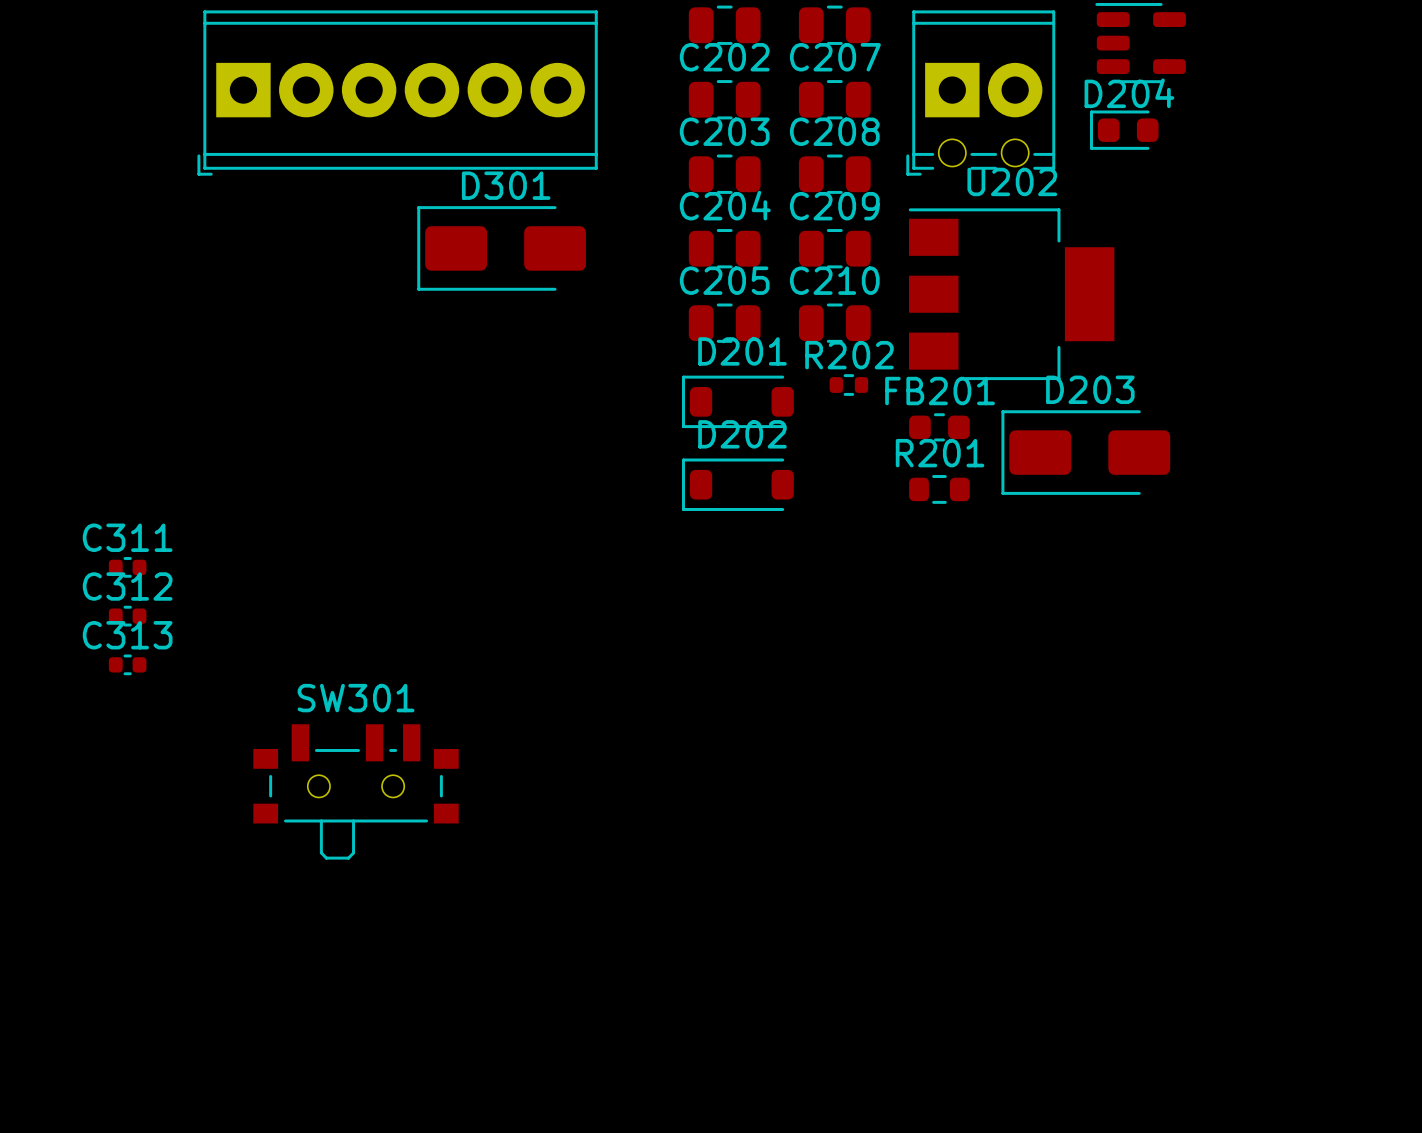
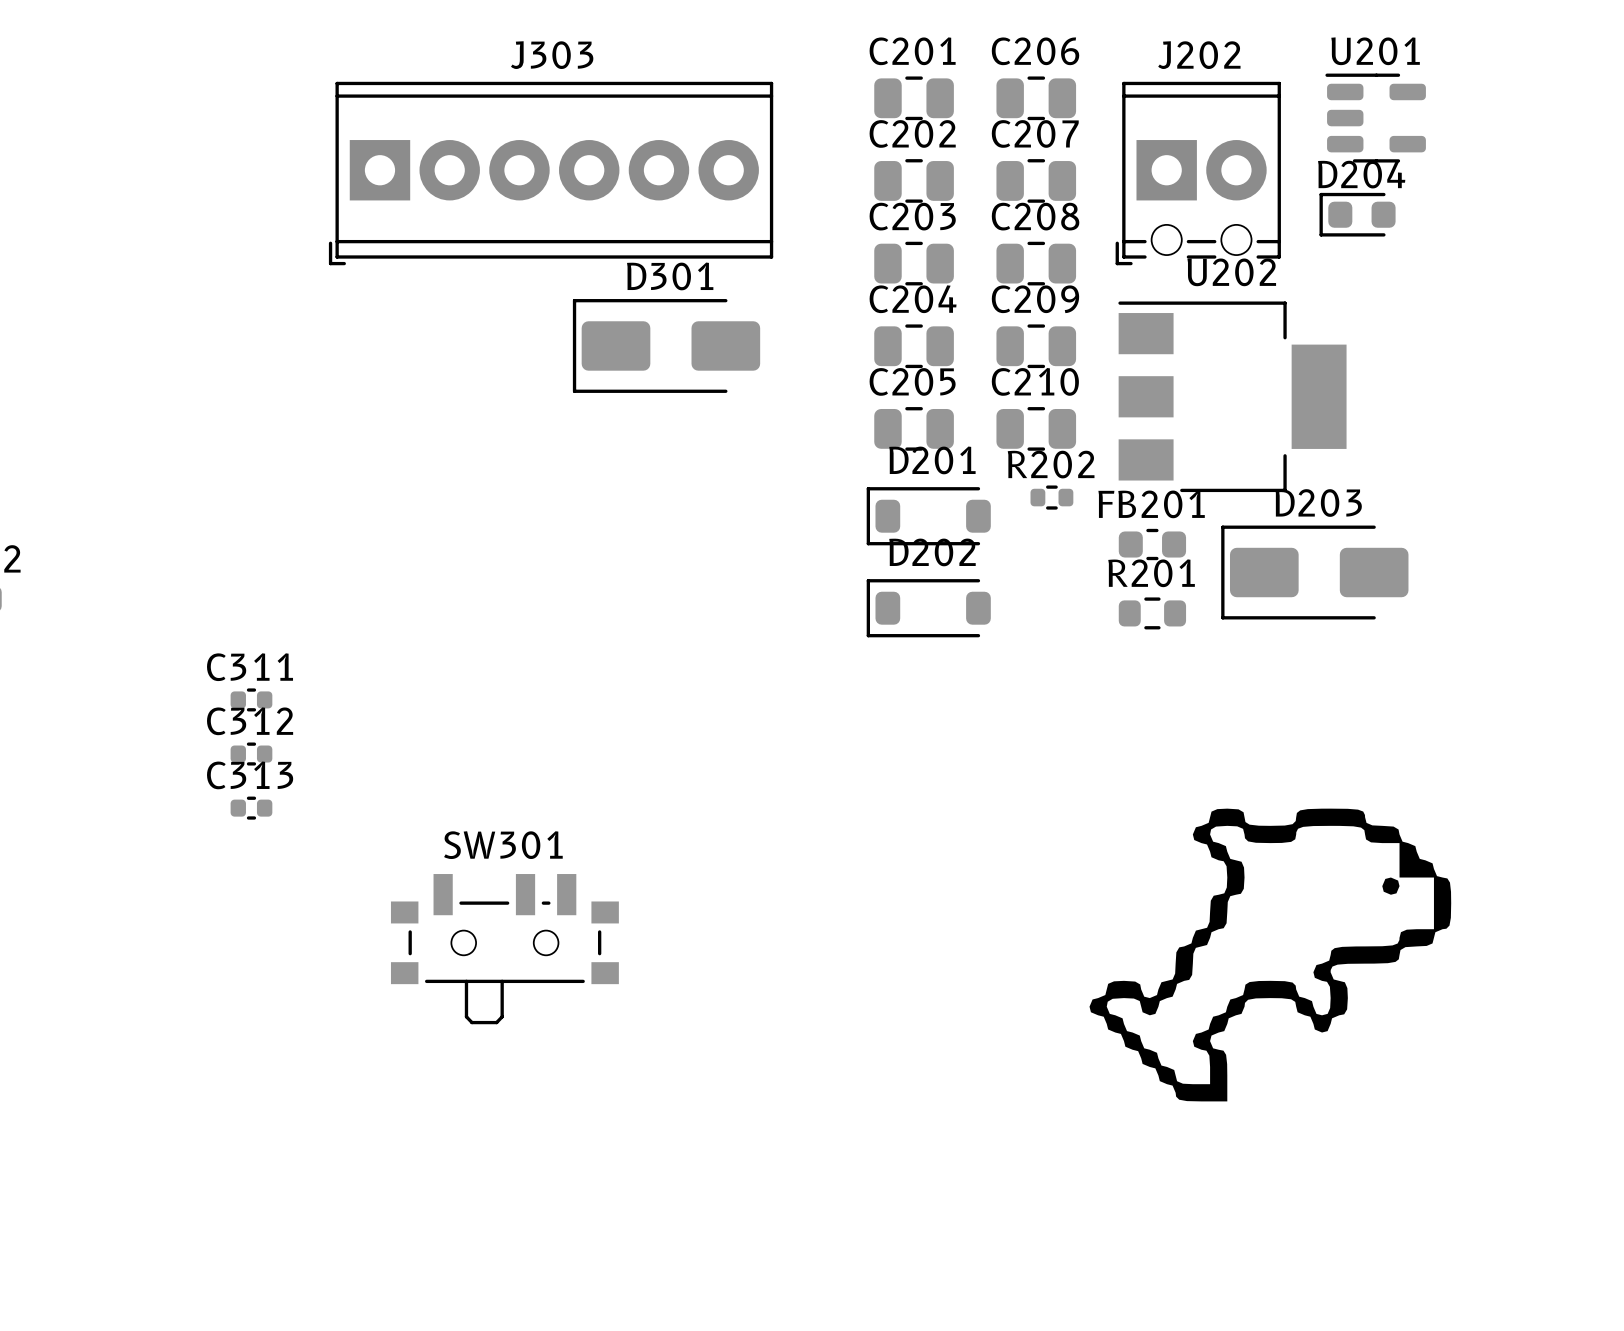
drawing: none -> [1089, 808, 1452, 1102]

